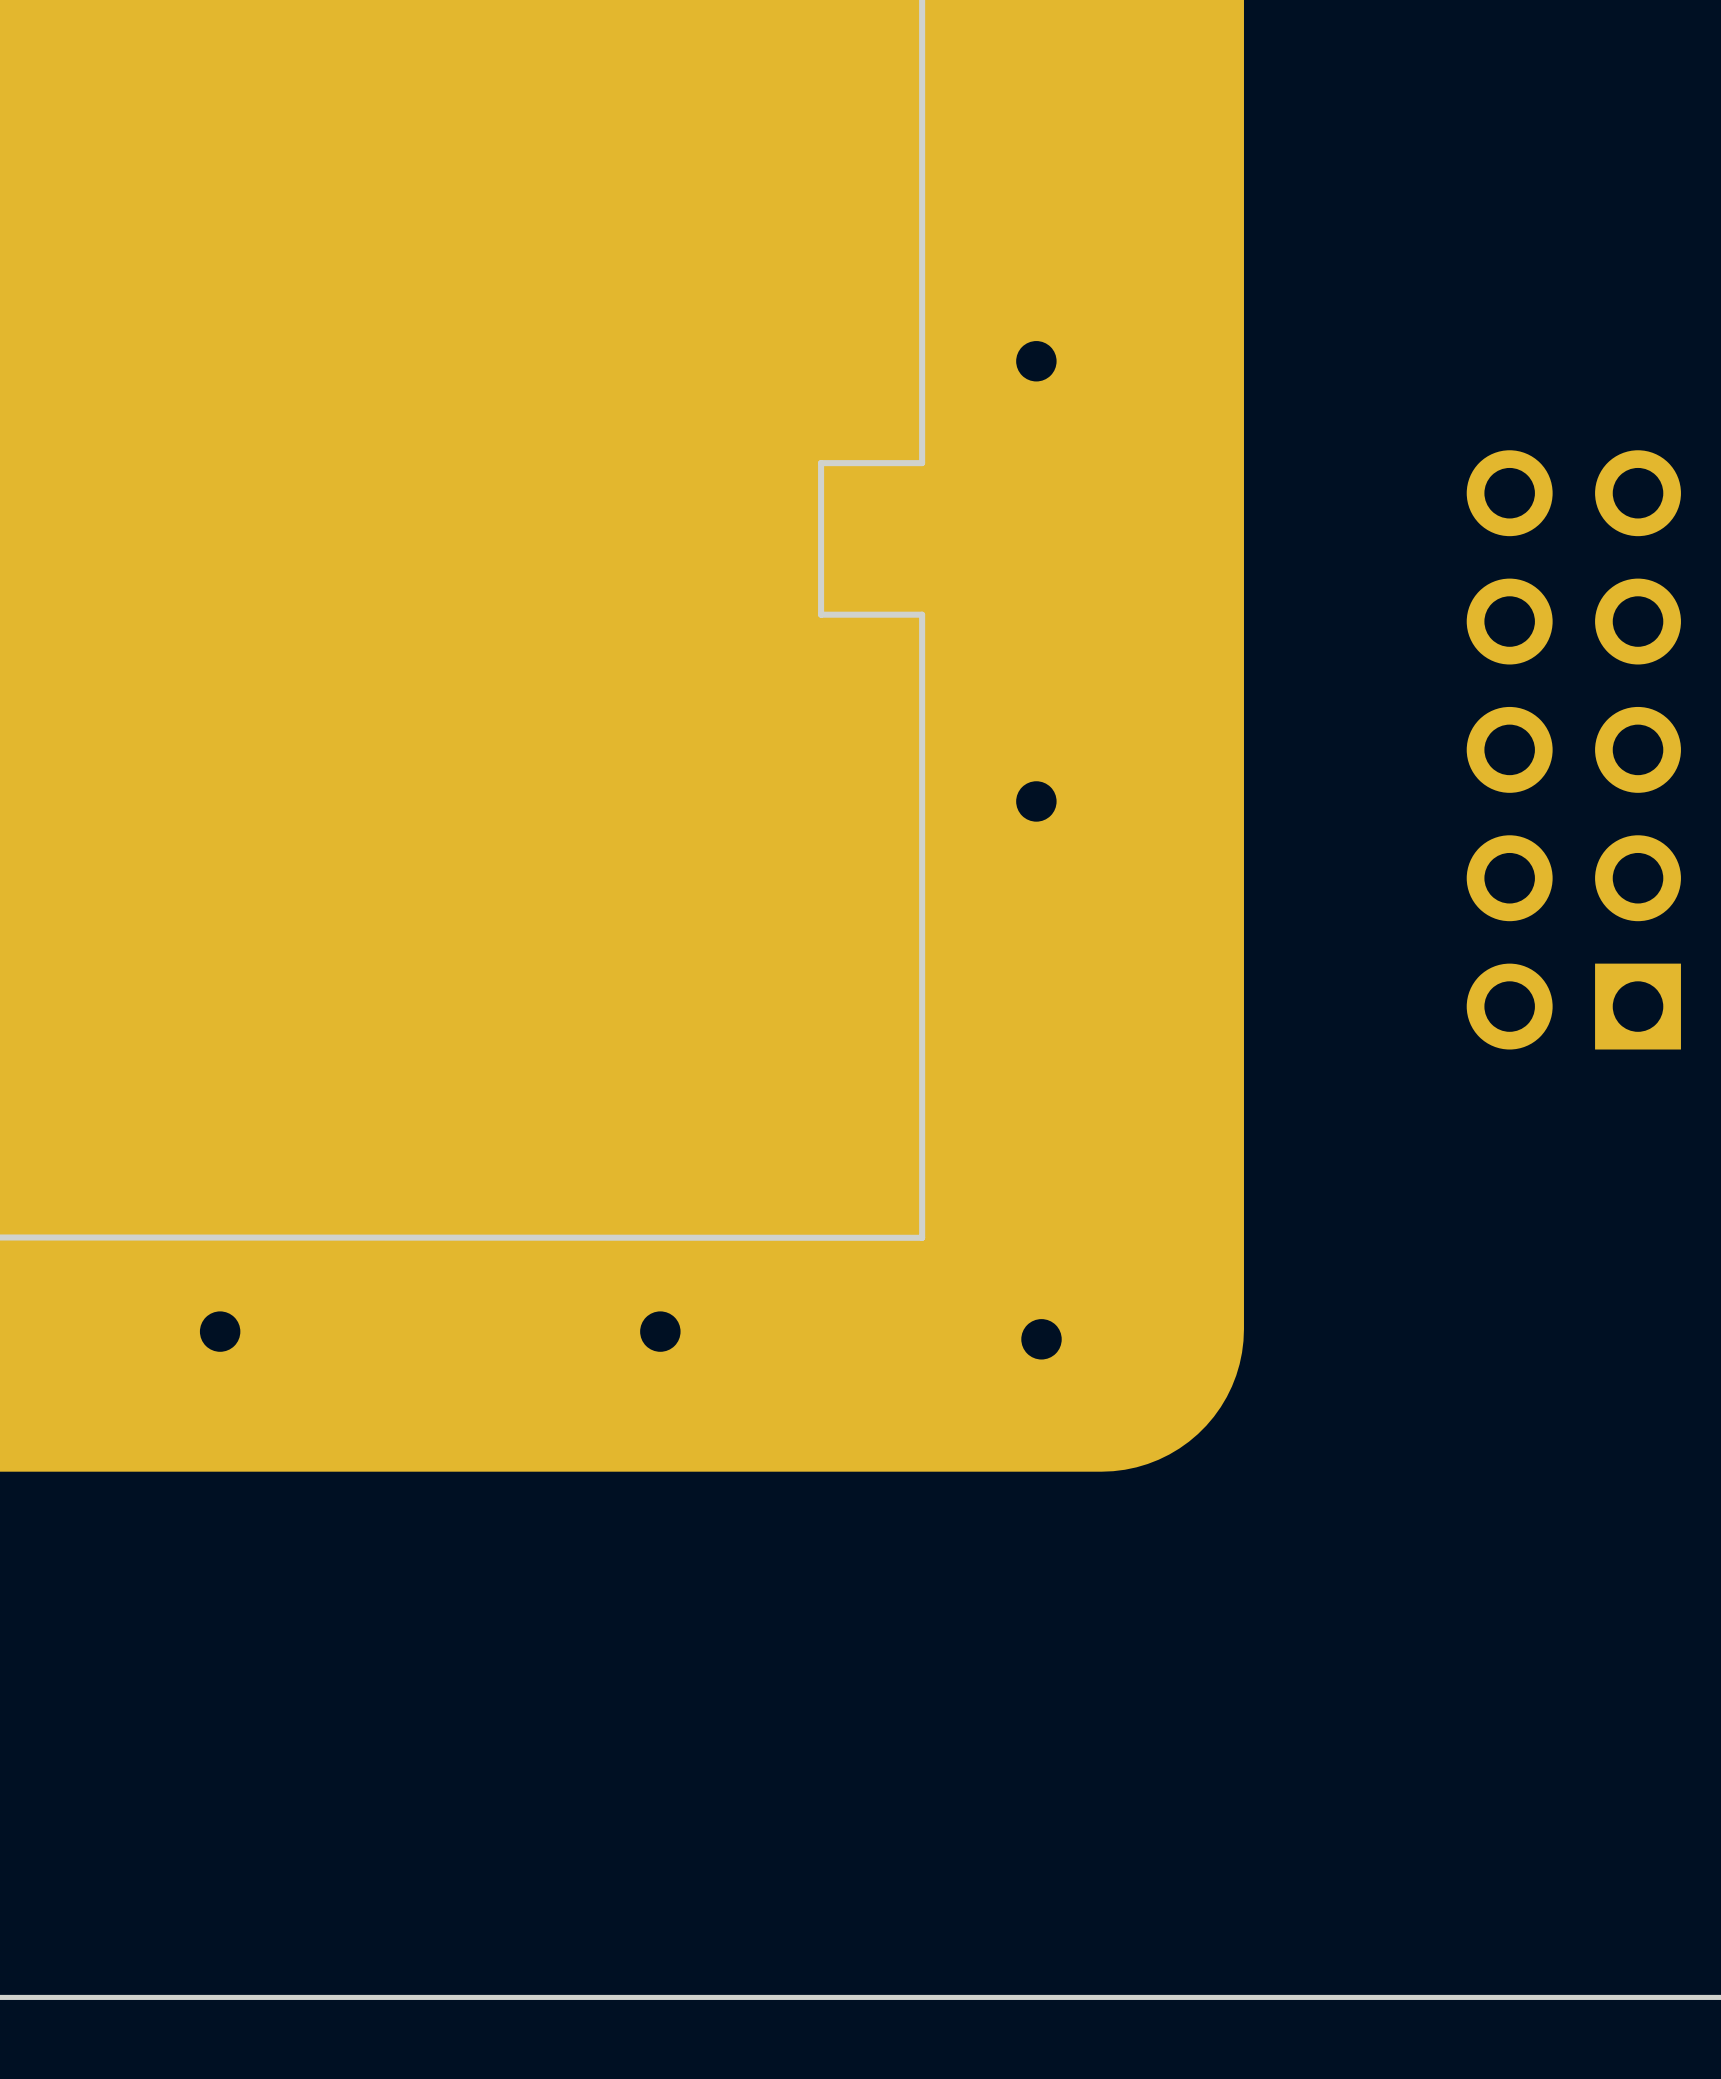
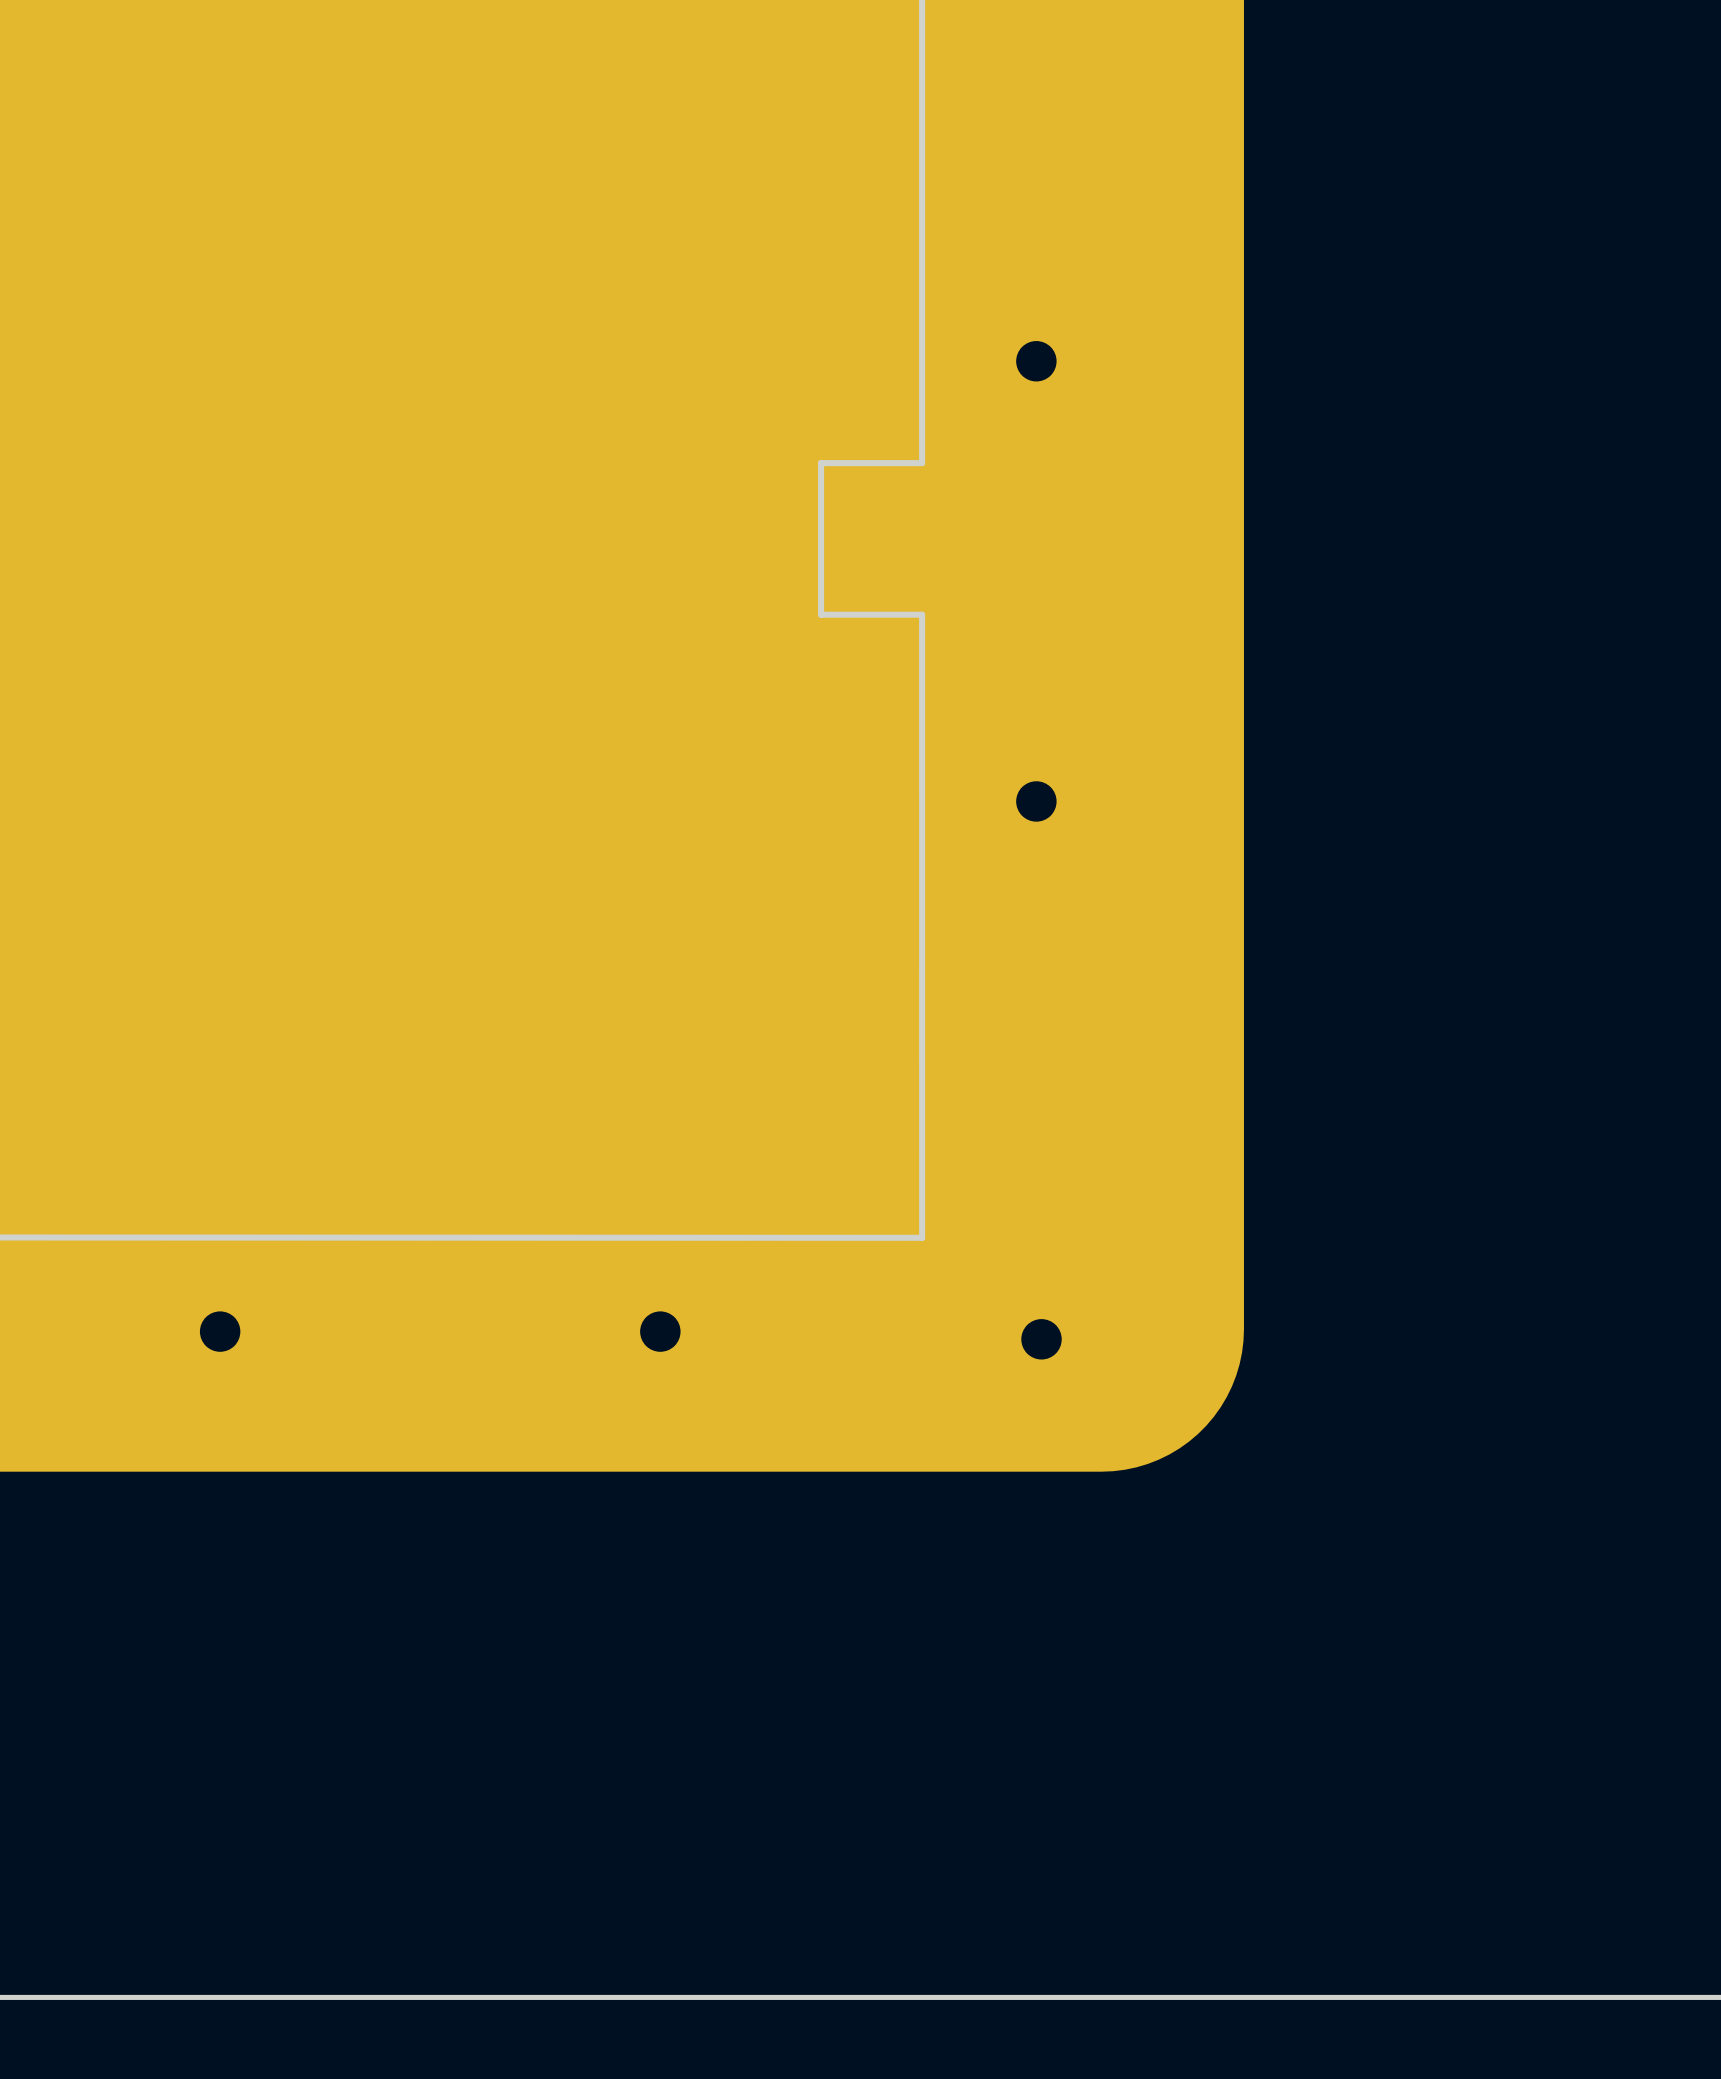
part: (1573, 749) -> none

